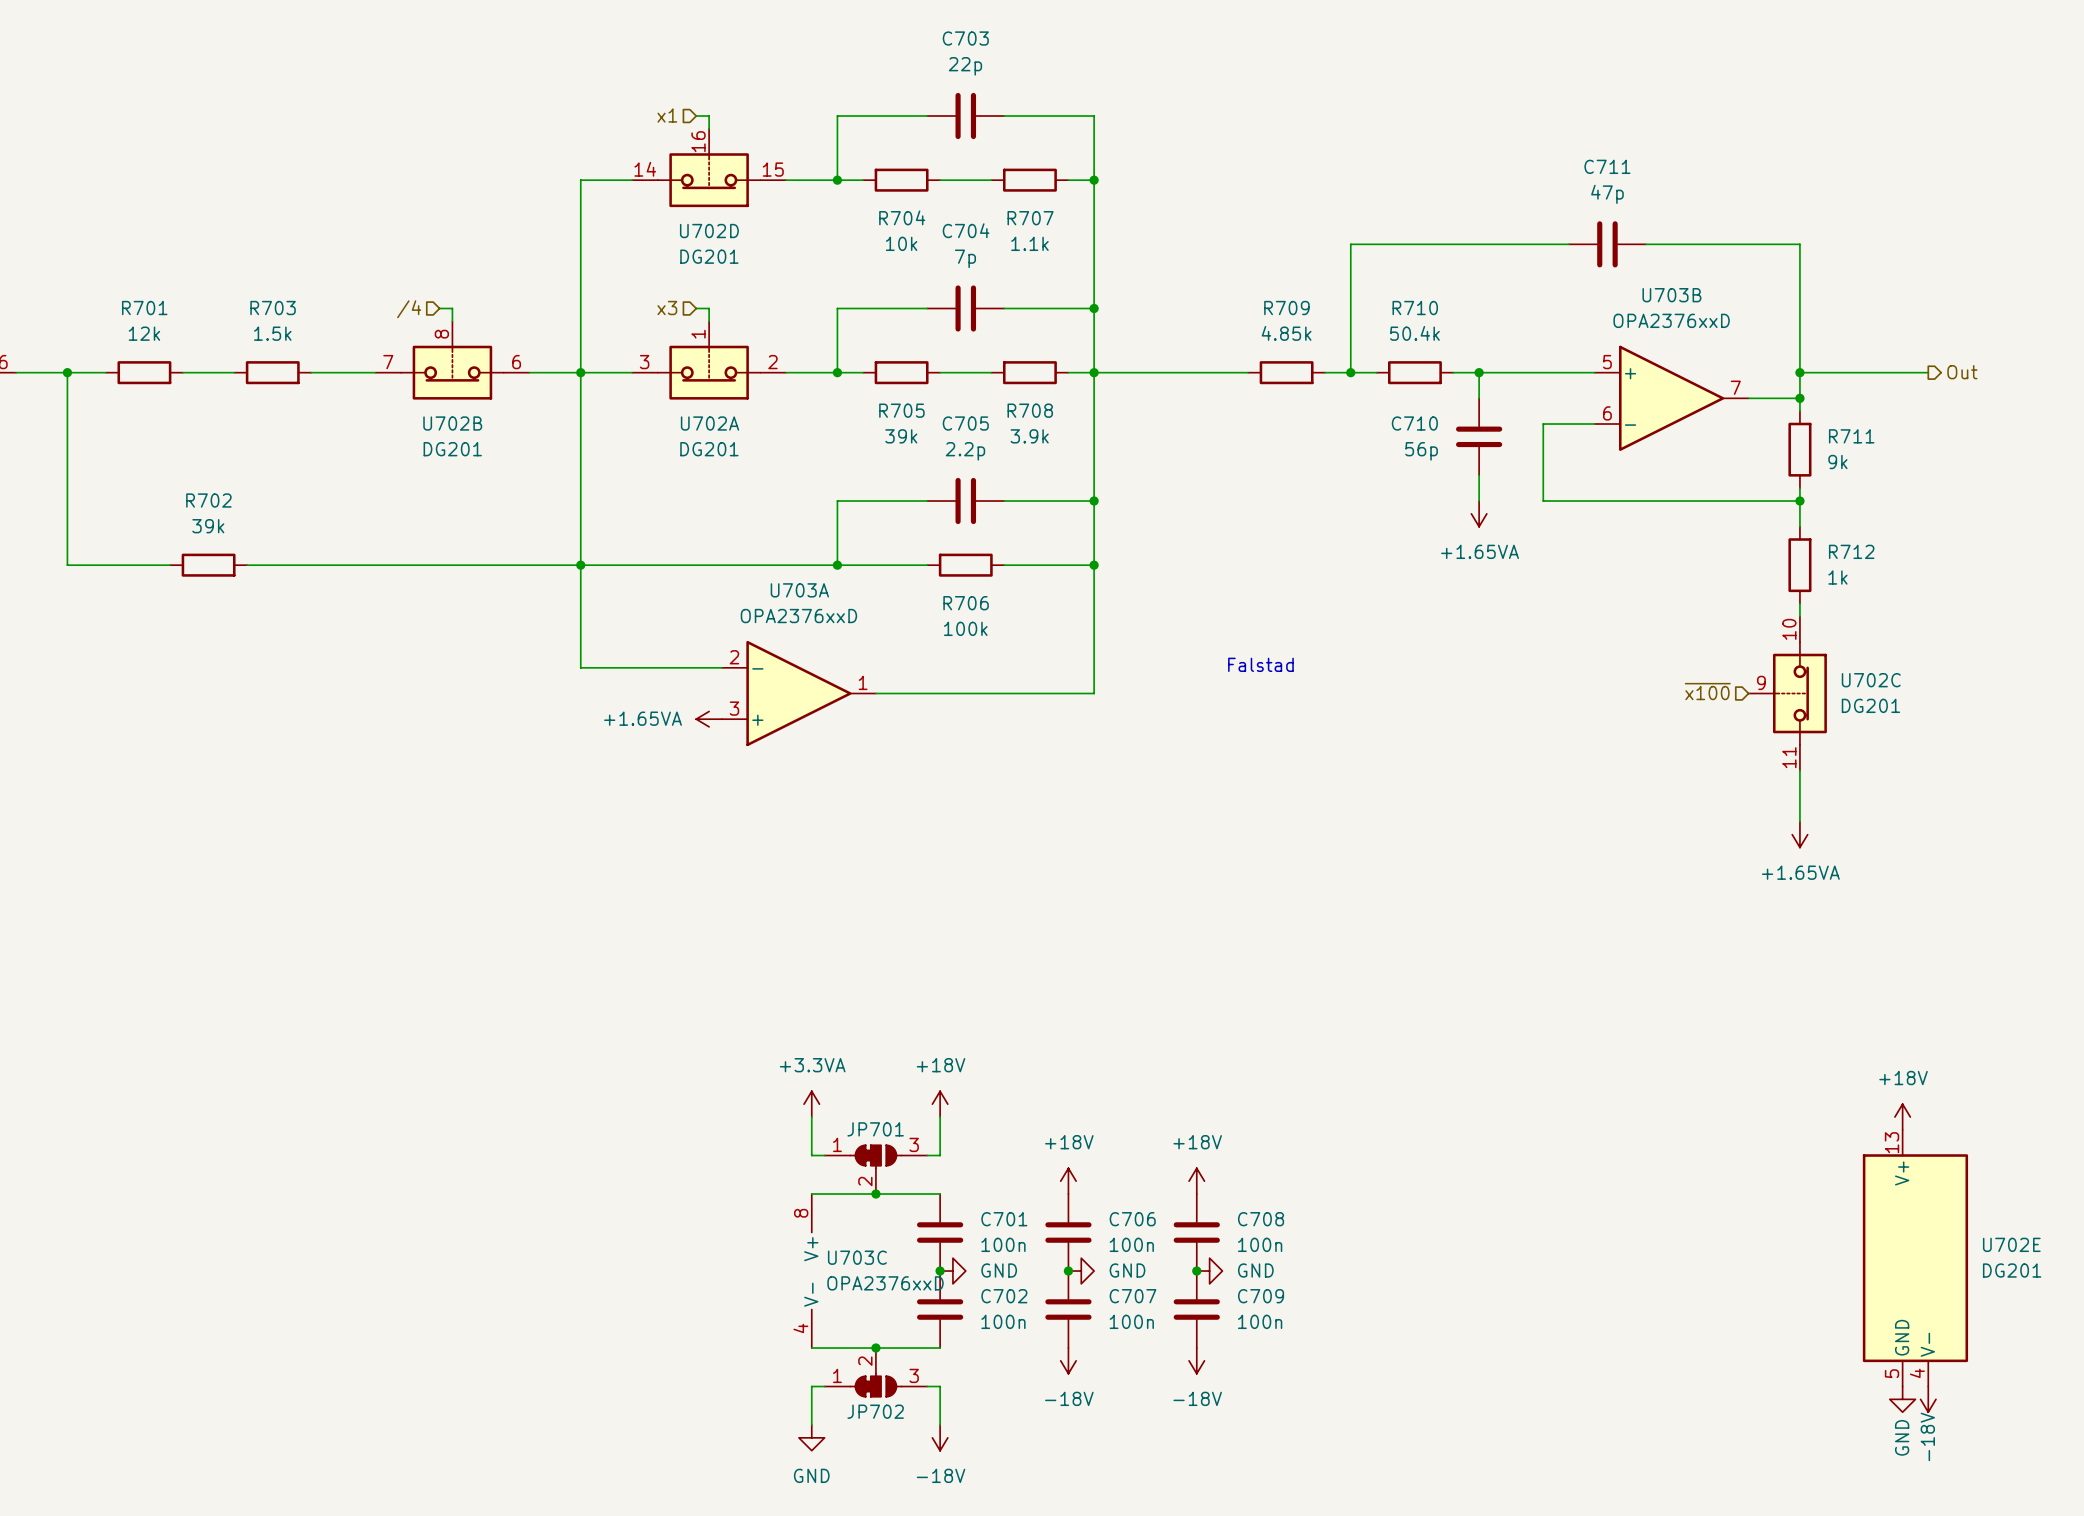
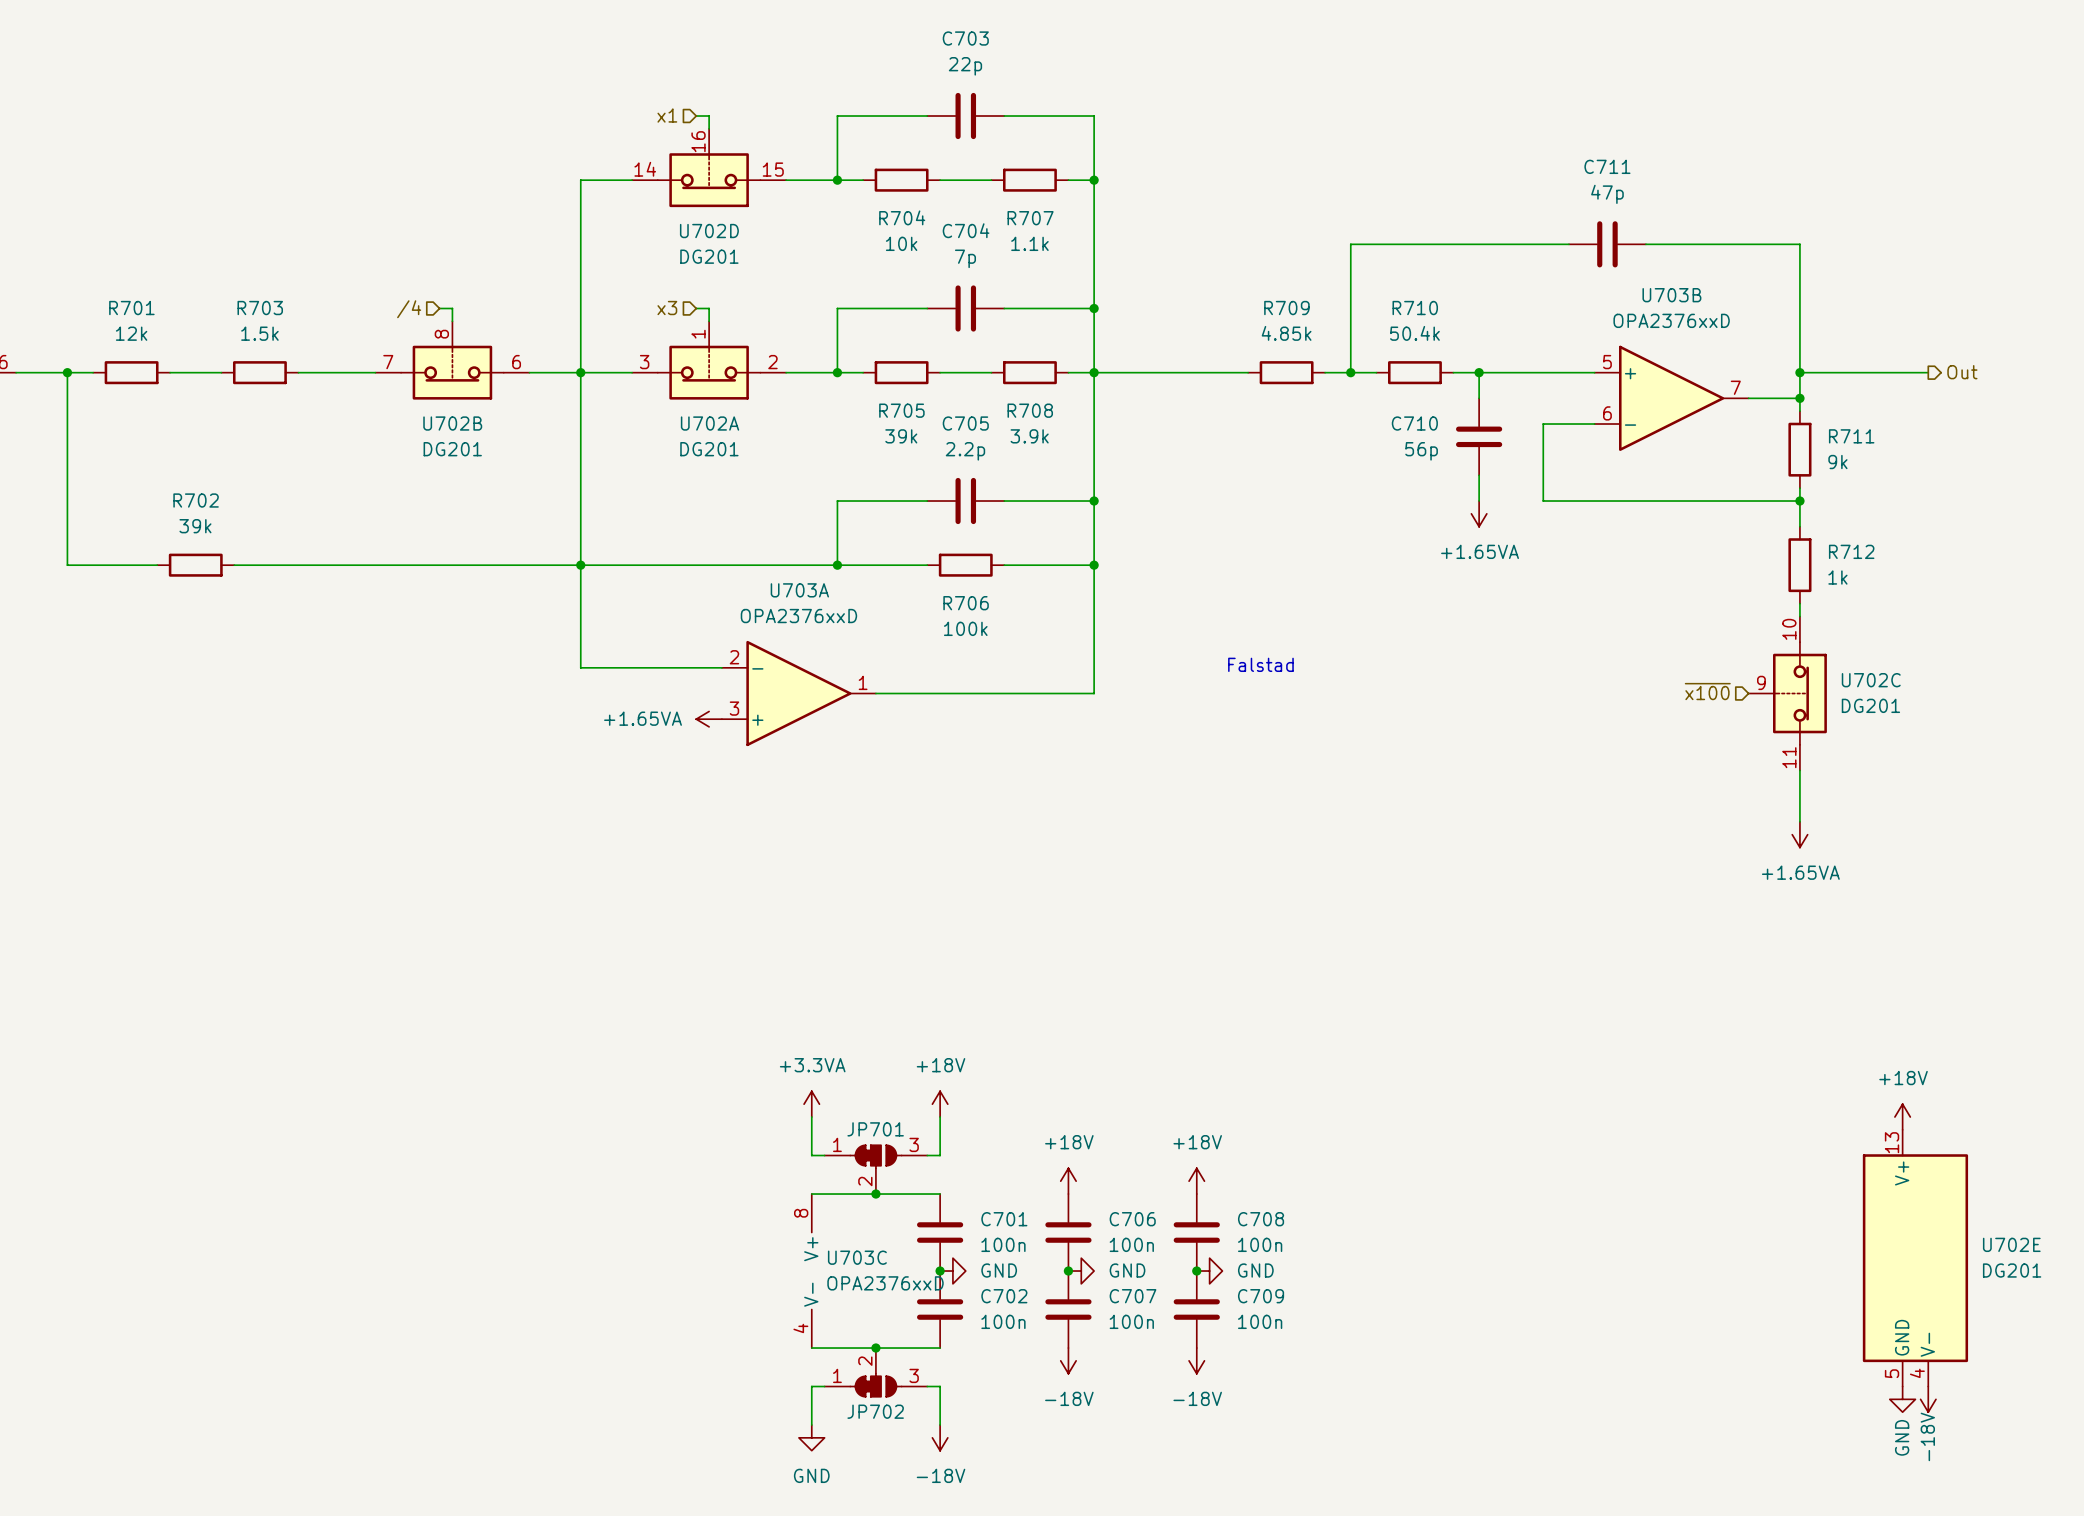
R701 position: (144, 372) -> (131, 372)
R703 position: (272, 372) -> (259, 372)
R702 position: (208, 565) -> (195, 565)

